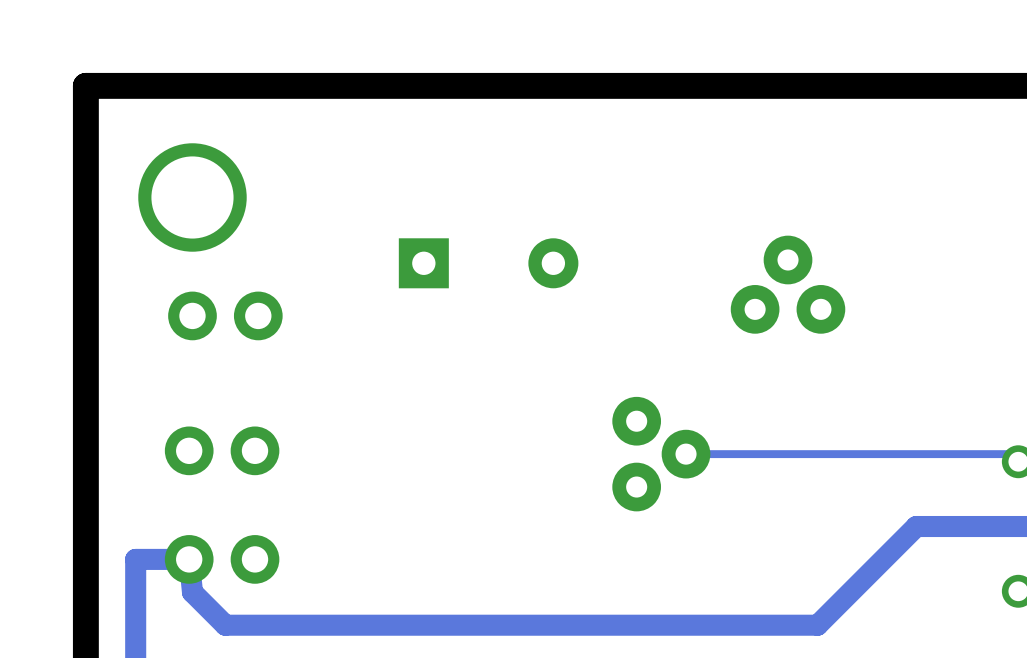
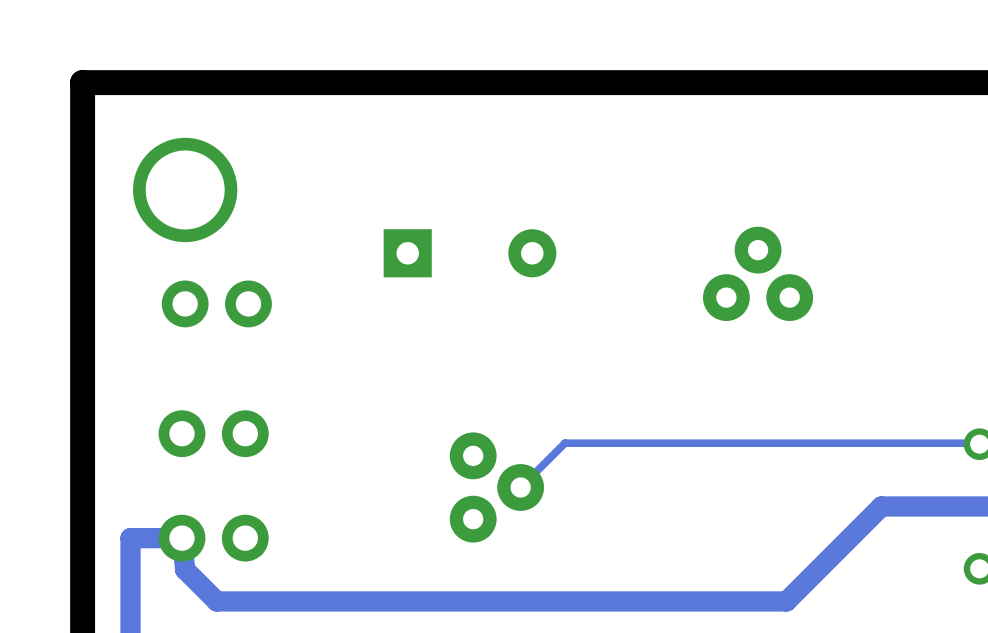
part position: (661, 454) -> (496, 487)
track: (1010, 454) (686, 454) -> none
track: none -> (978, 443) (564, 443) (520, 487)

